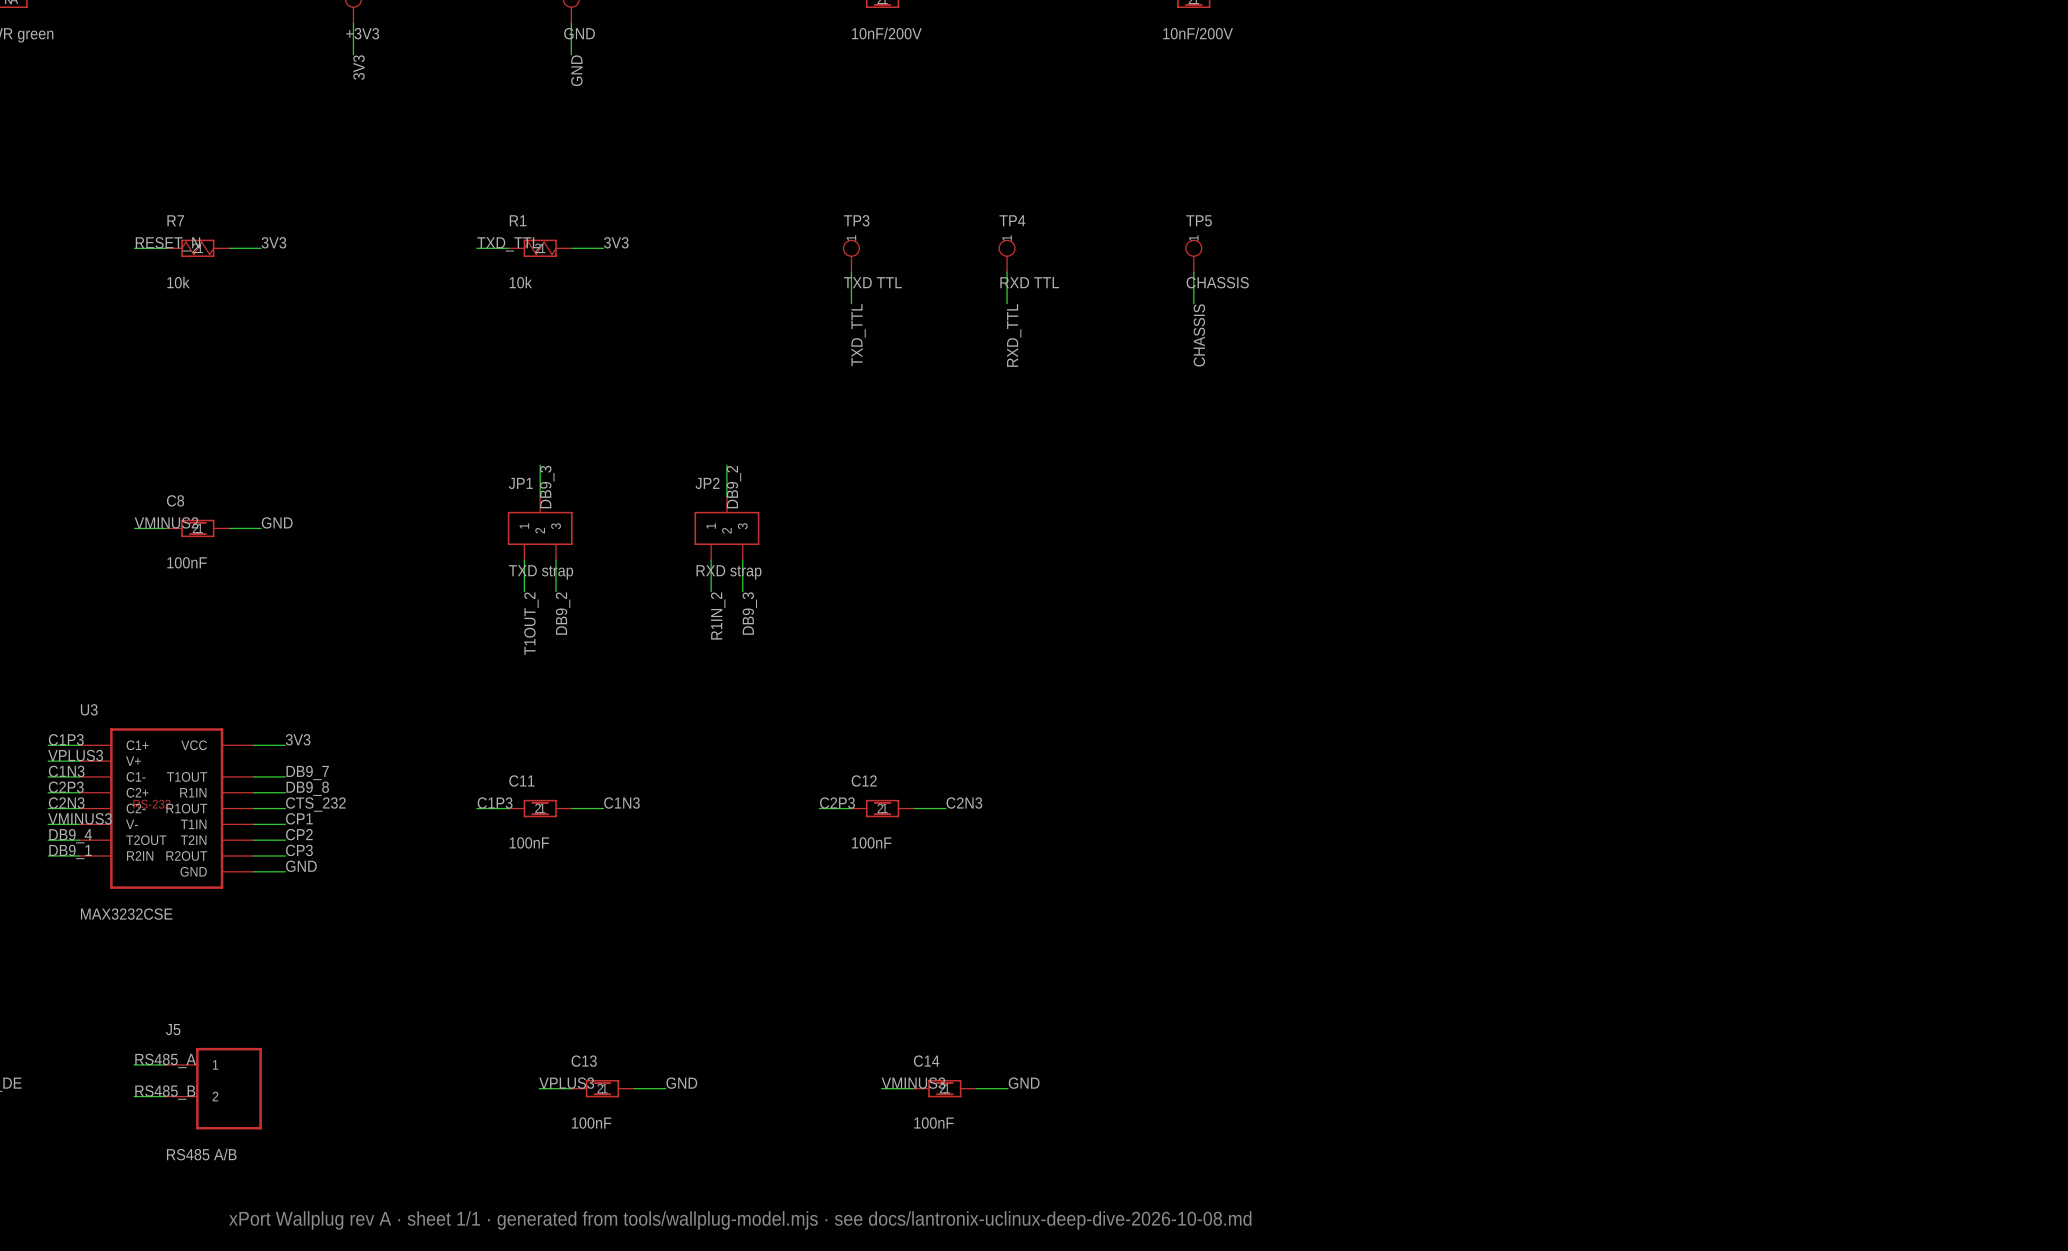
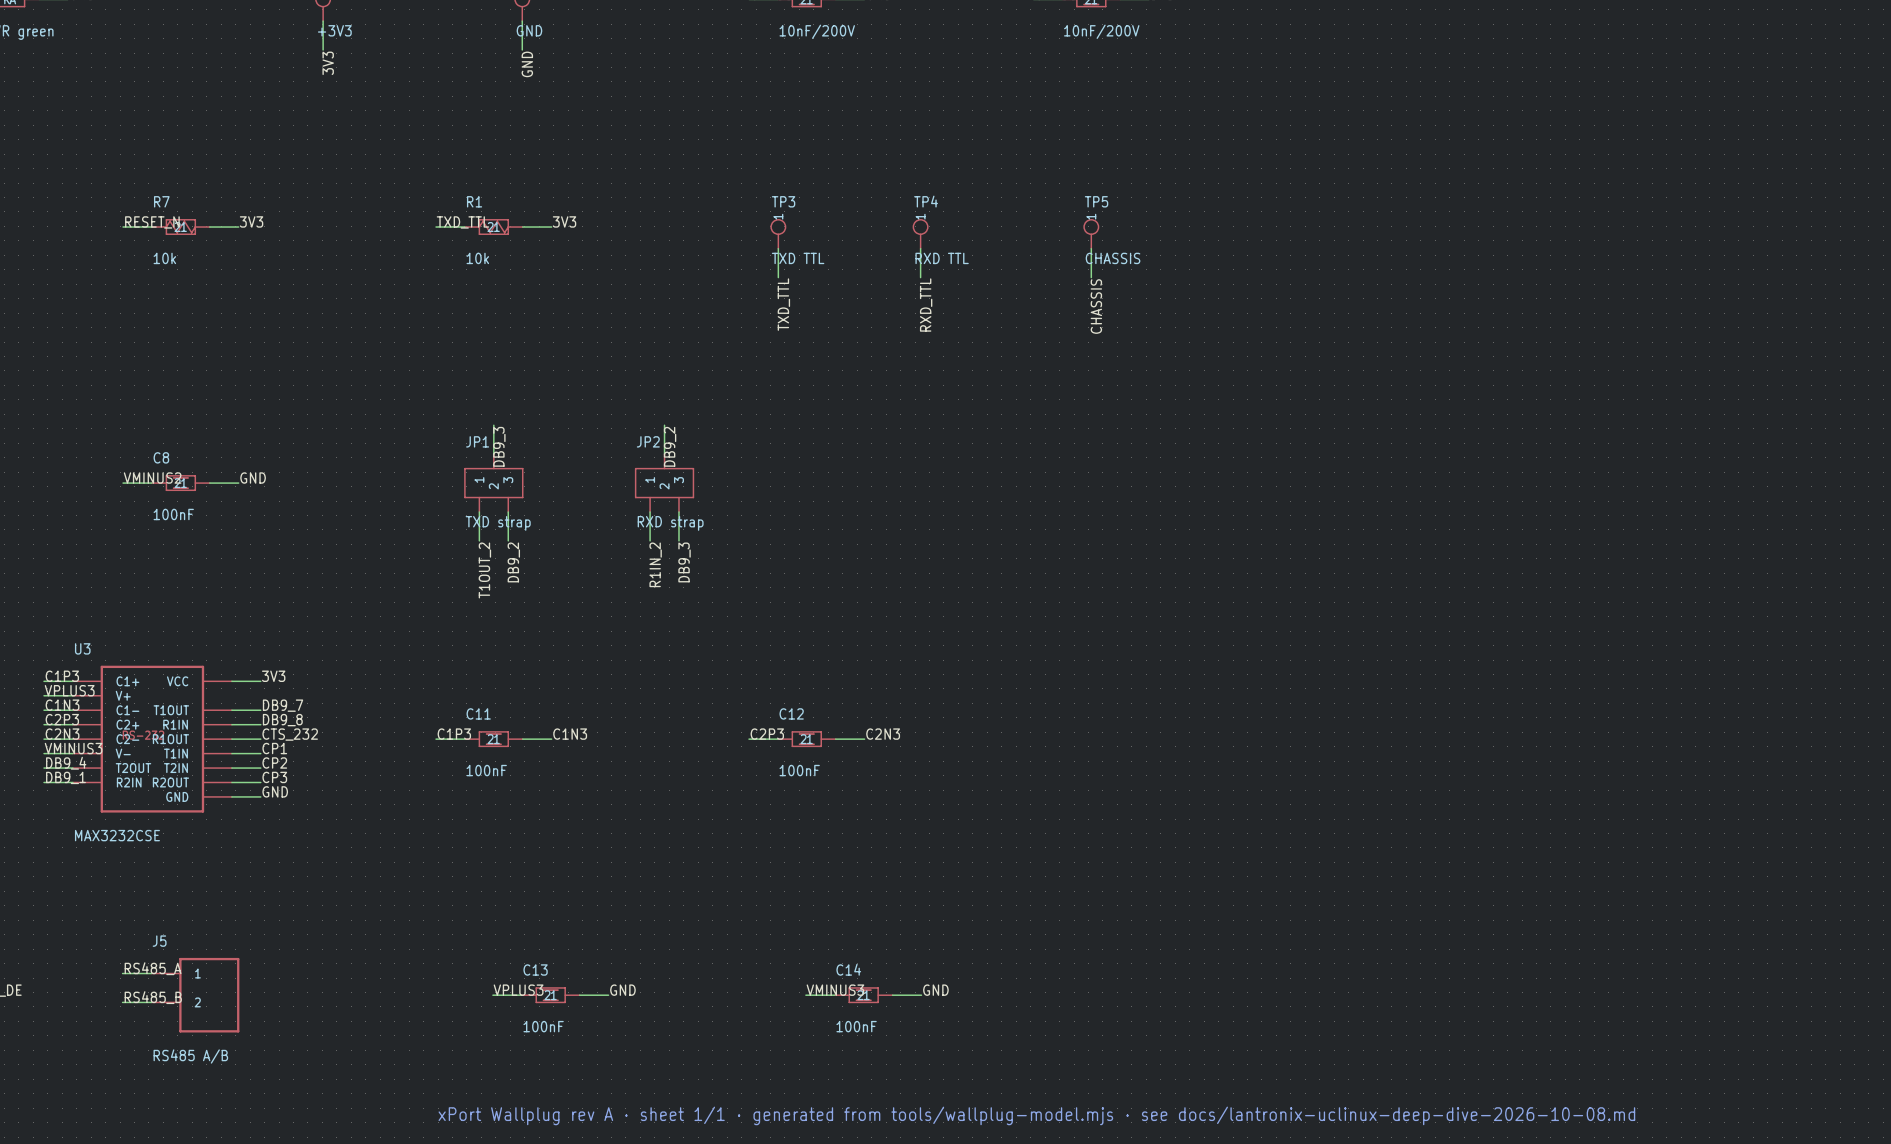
text: xPort Wallplug rev A · sheet 1/1 · generated from tools/wallplug-model.mjs · see docs/lantronix-uclinux-deep-dive-2026-10-08.md (740, 1220) -> none
text: none -> xPort Wallplug rev A · sheet 1/1 · generated from tools/wallplug-model.mjs · see docs/lantronix-uclinux-deep-dive-2026-10-08.md (1036, 1115)

